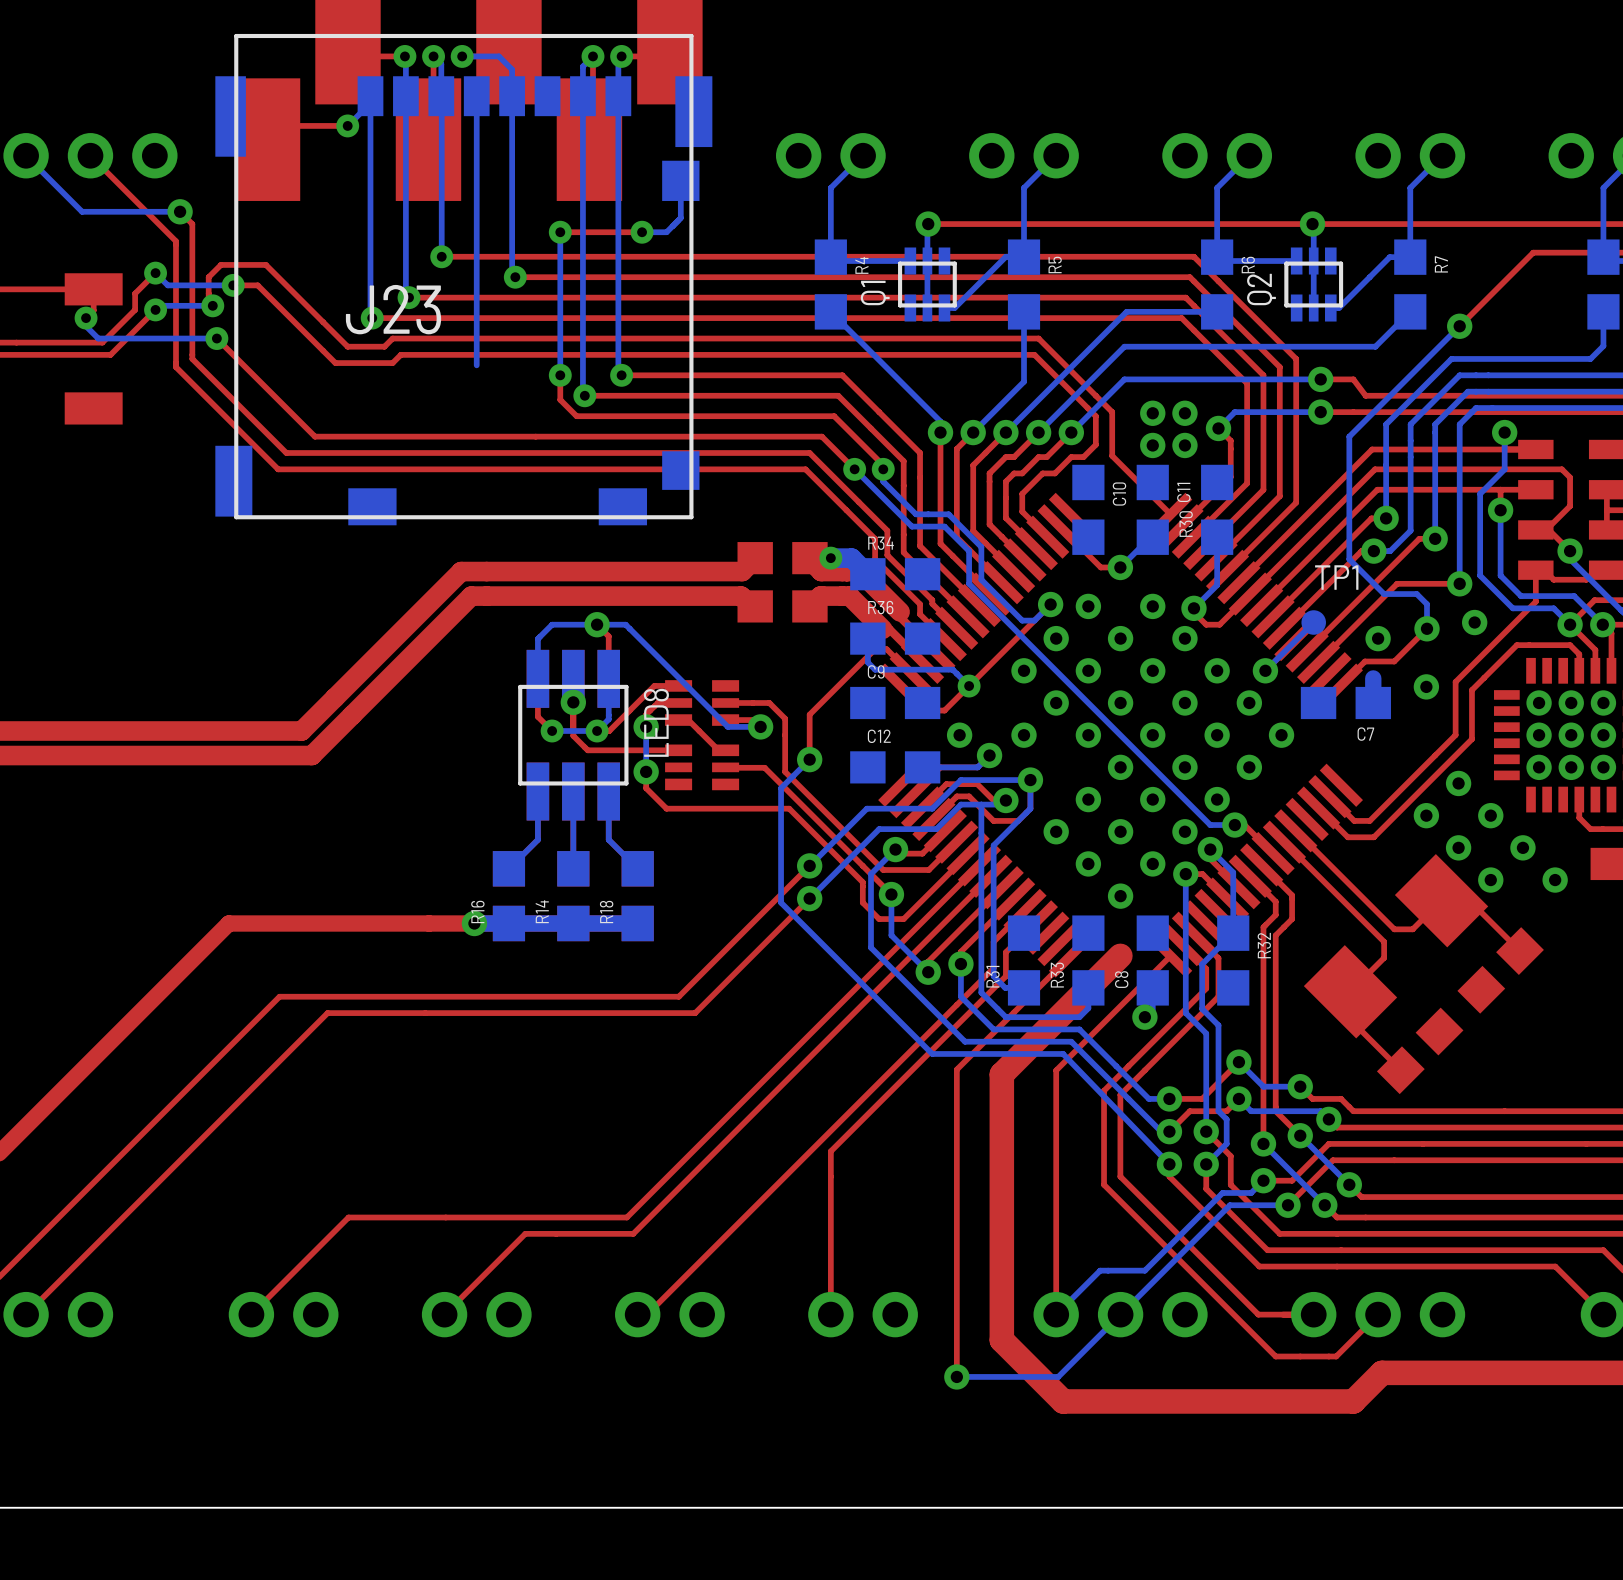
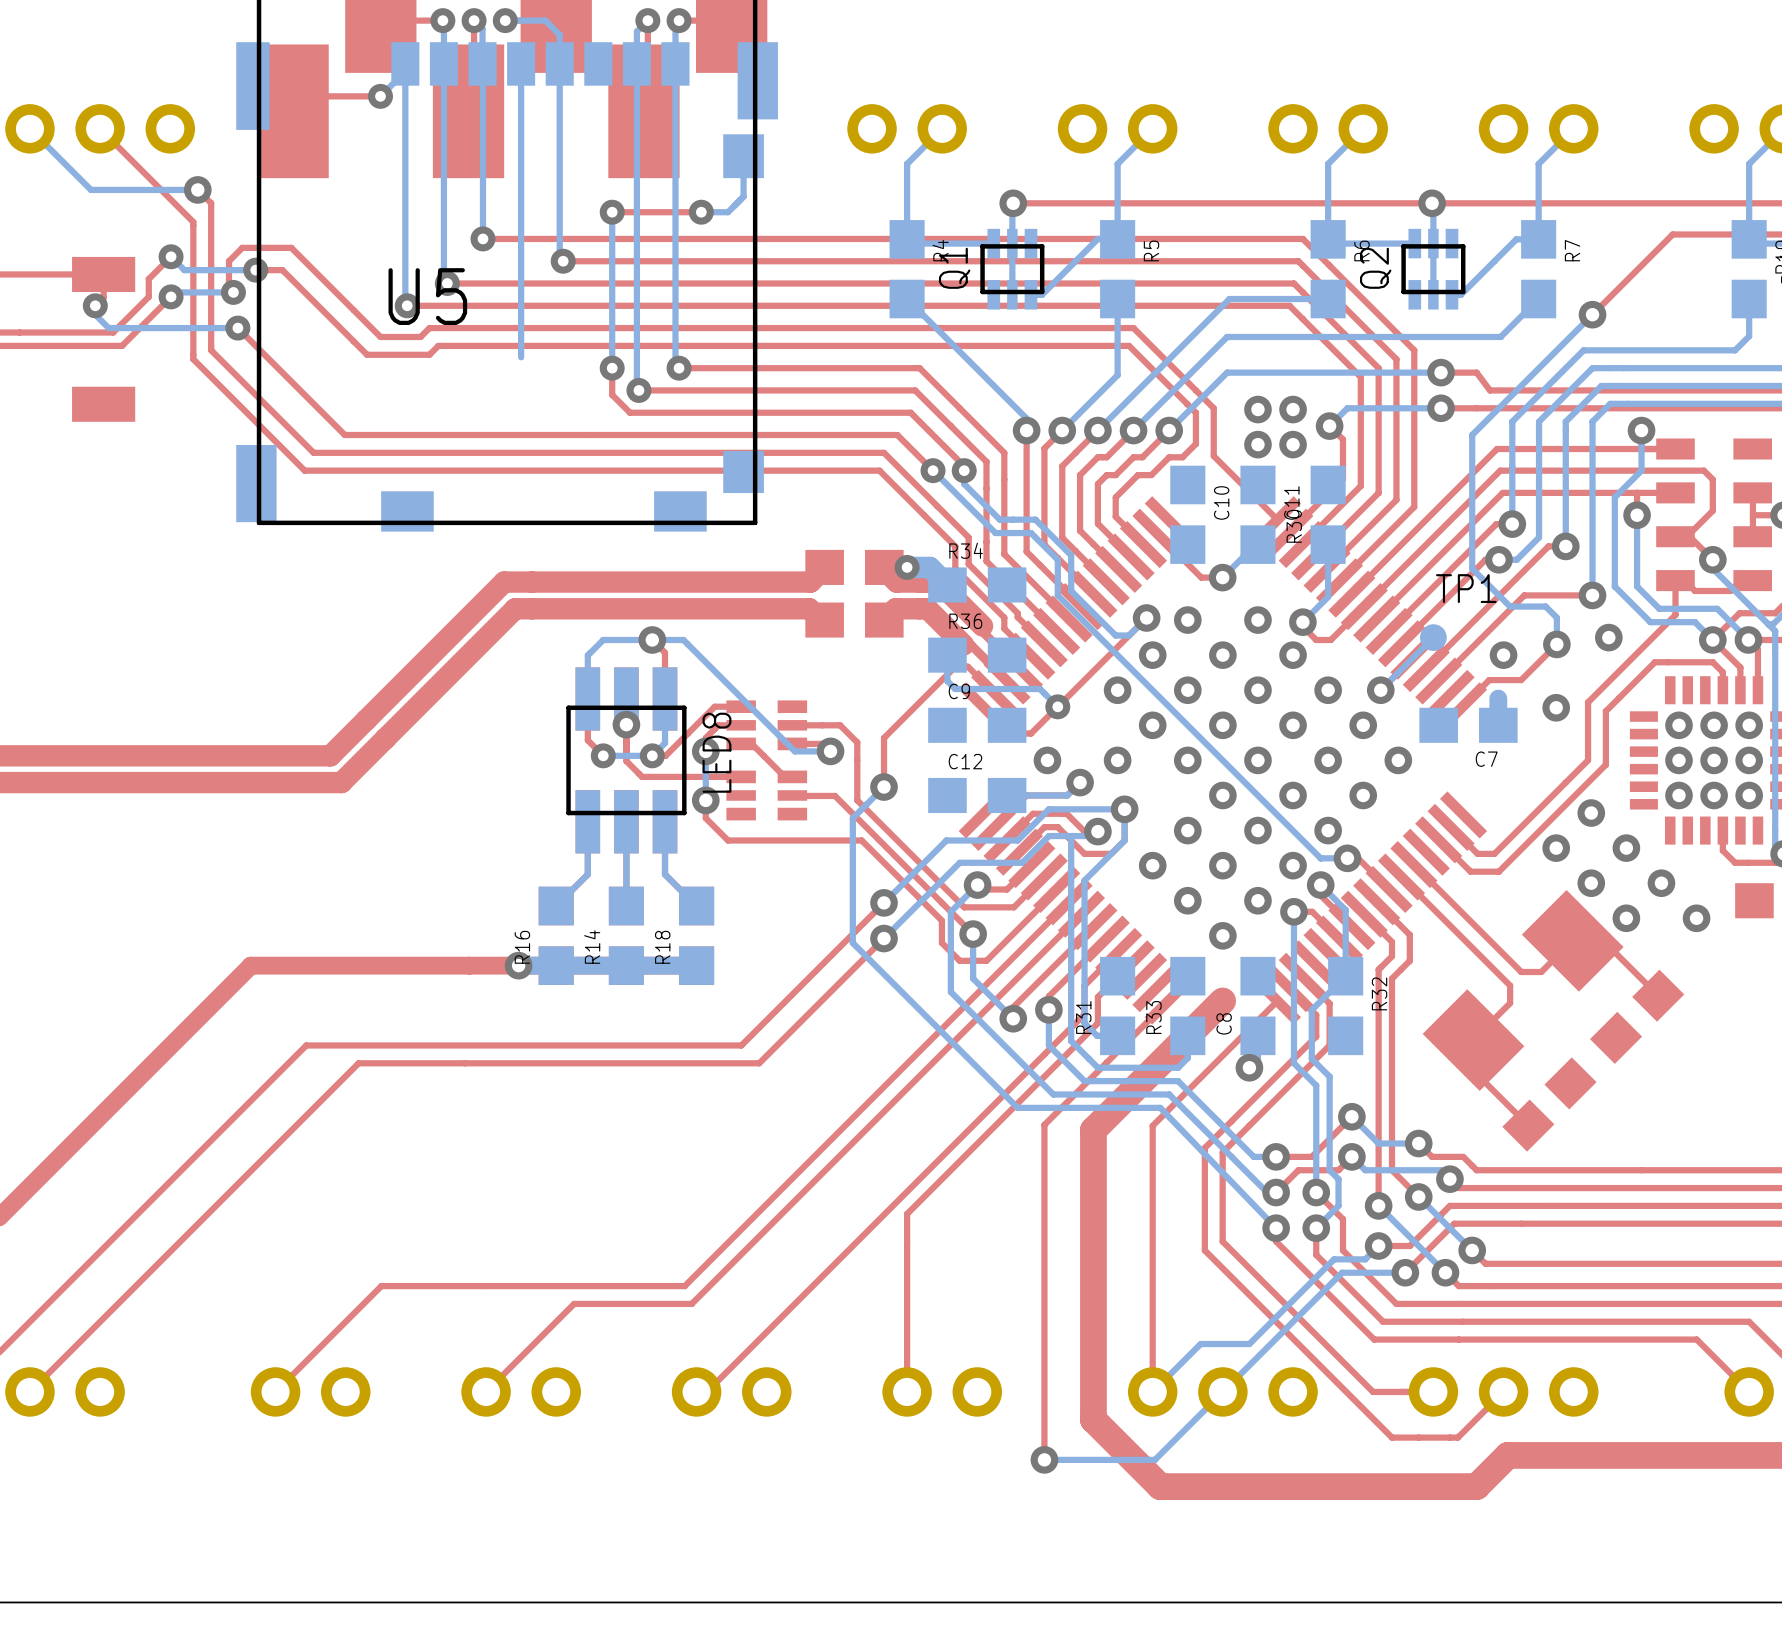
J23 name: J23 (393, 309) -> U5 (427, 296)

